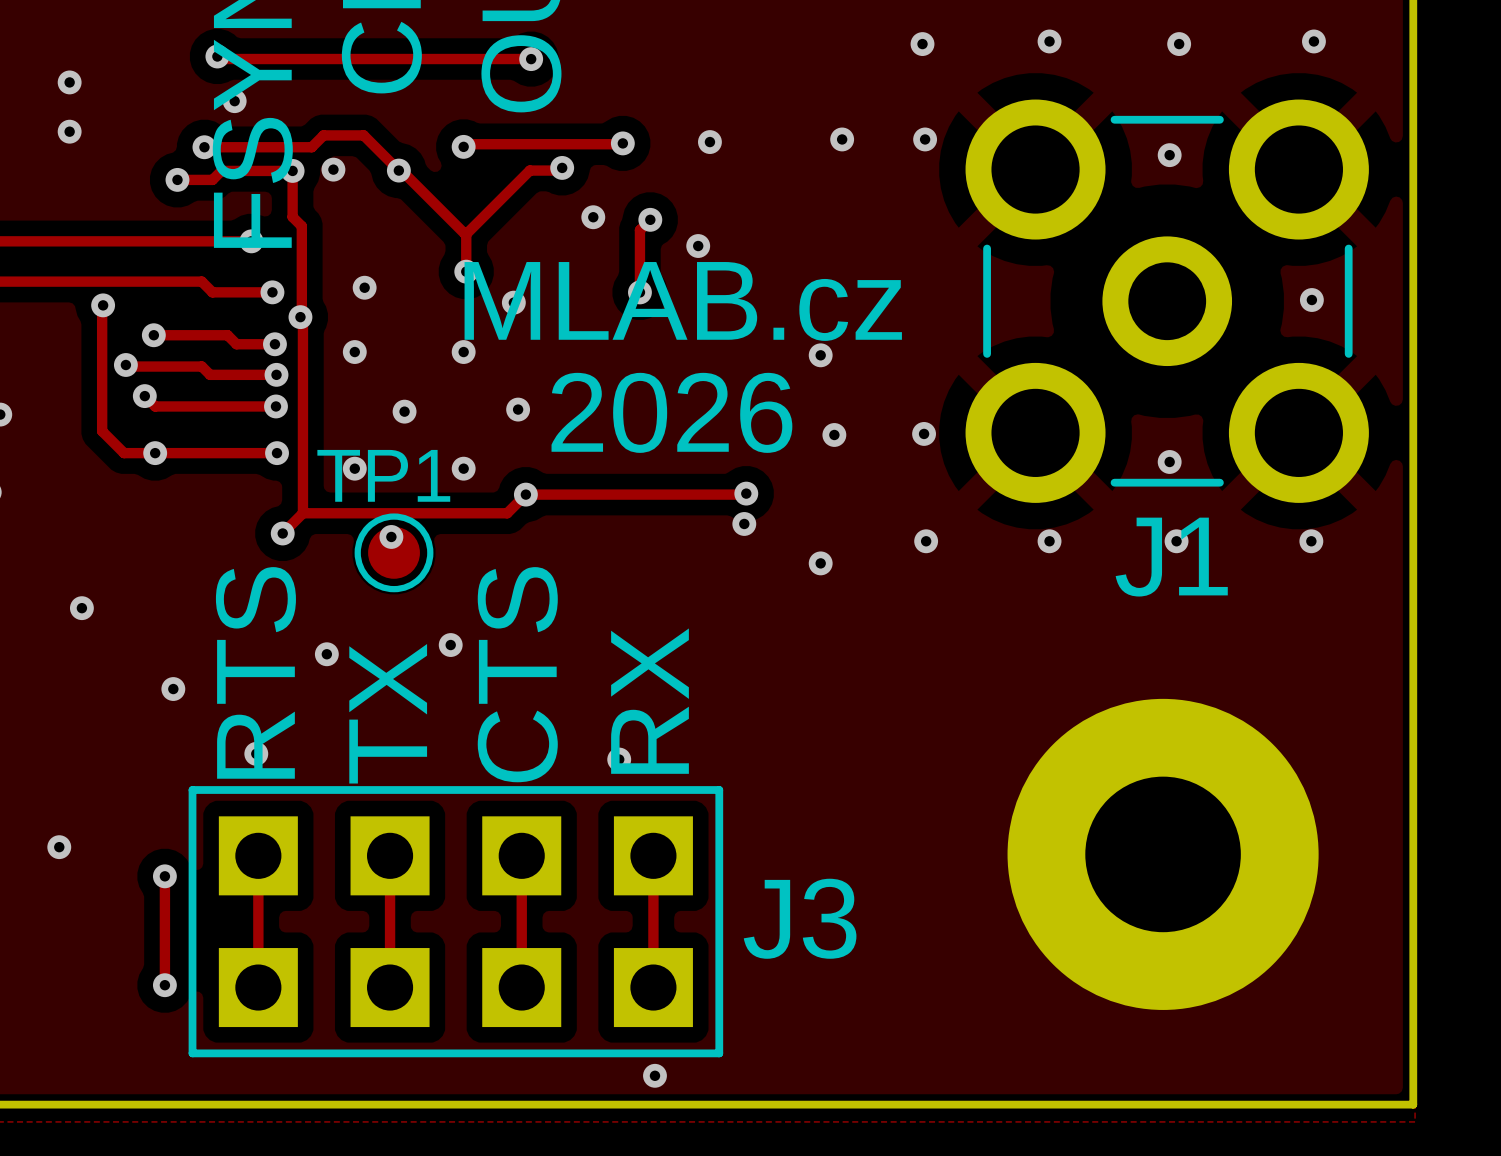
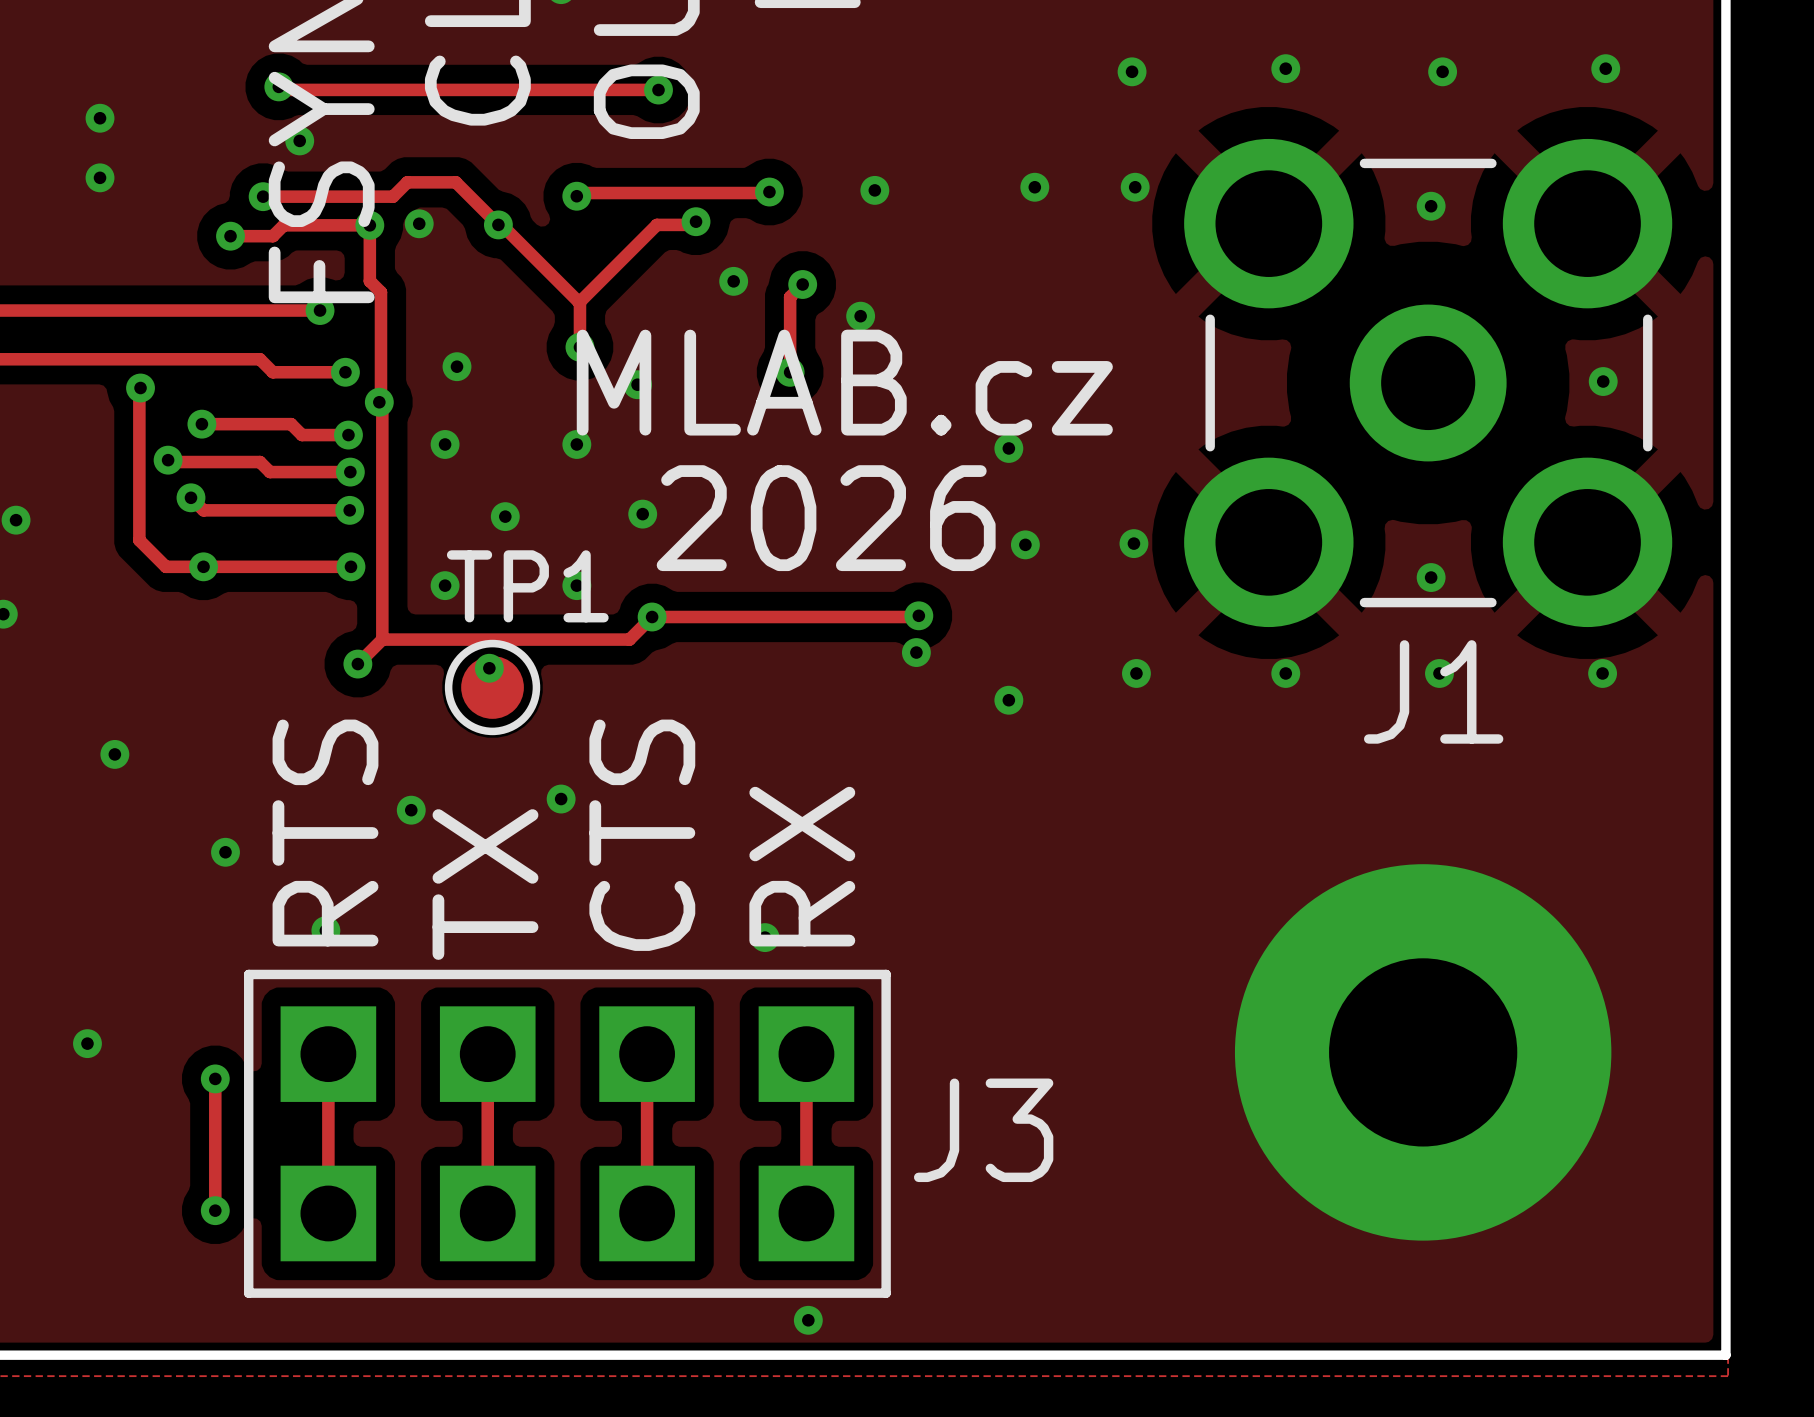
TP1 name position: TP1 (383, 475) -> TP1 (527, 586)

